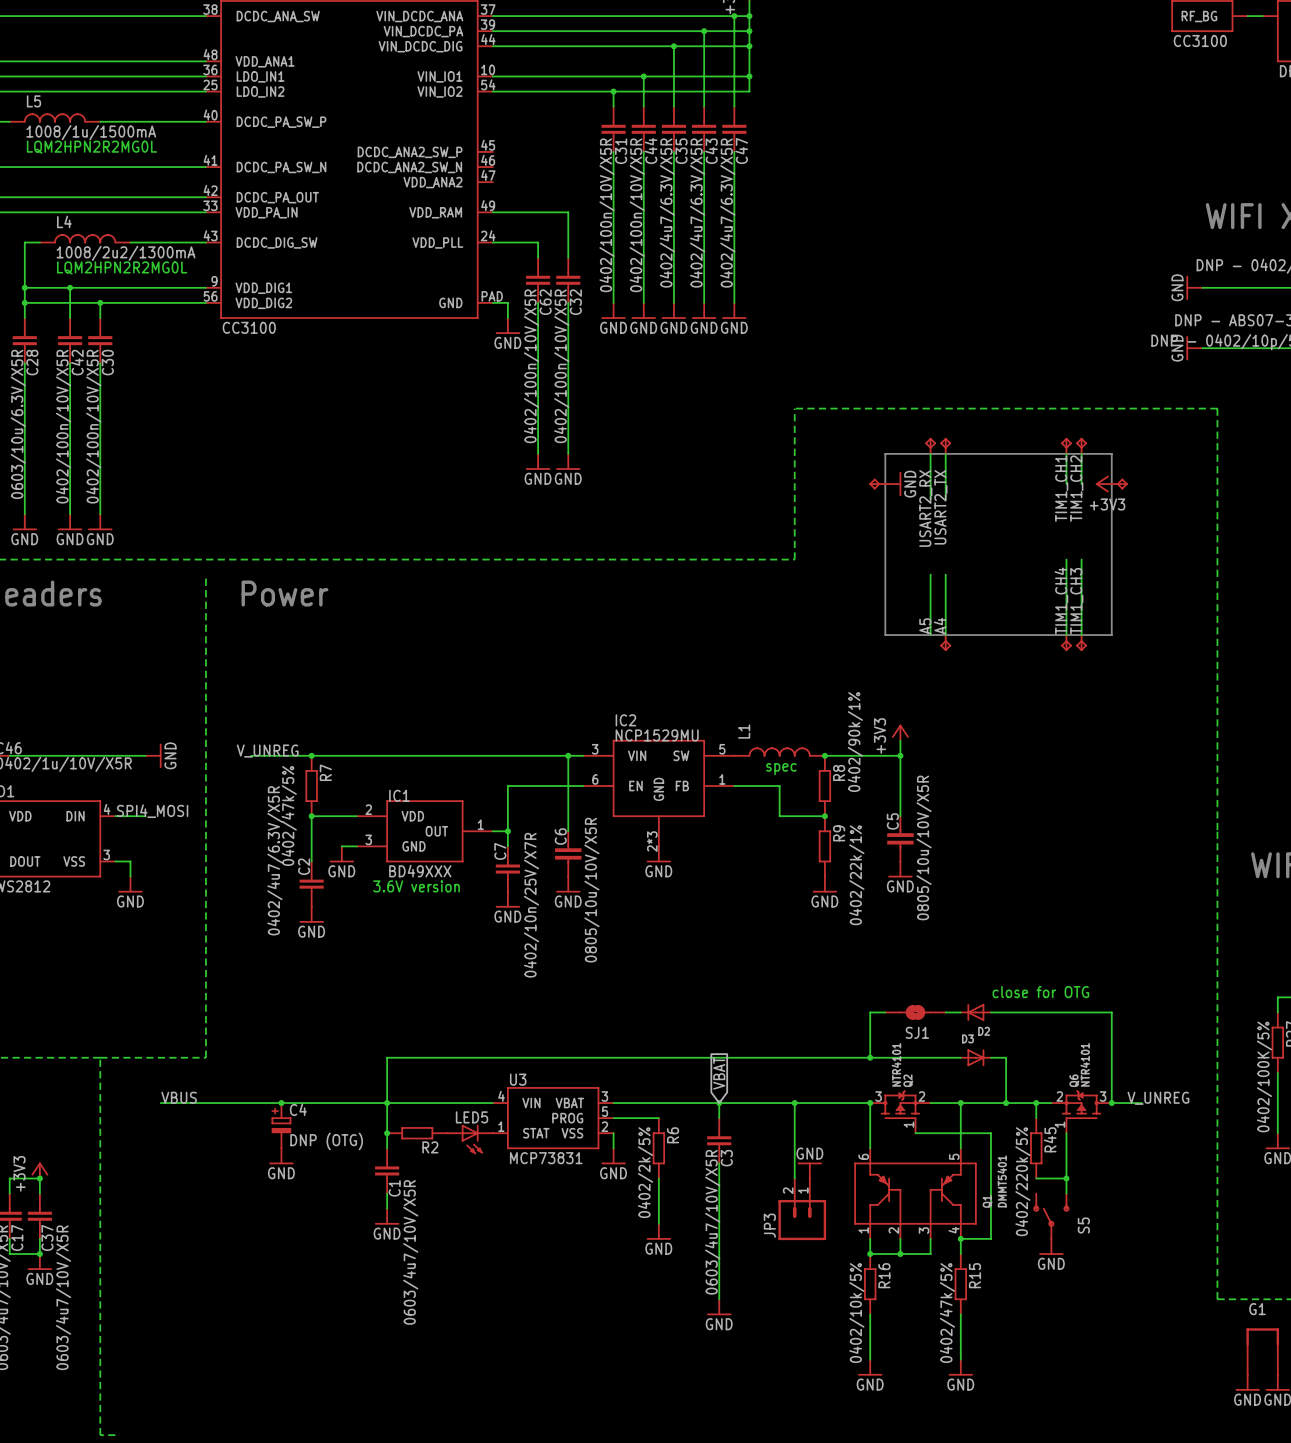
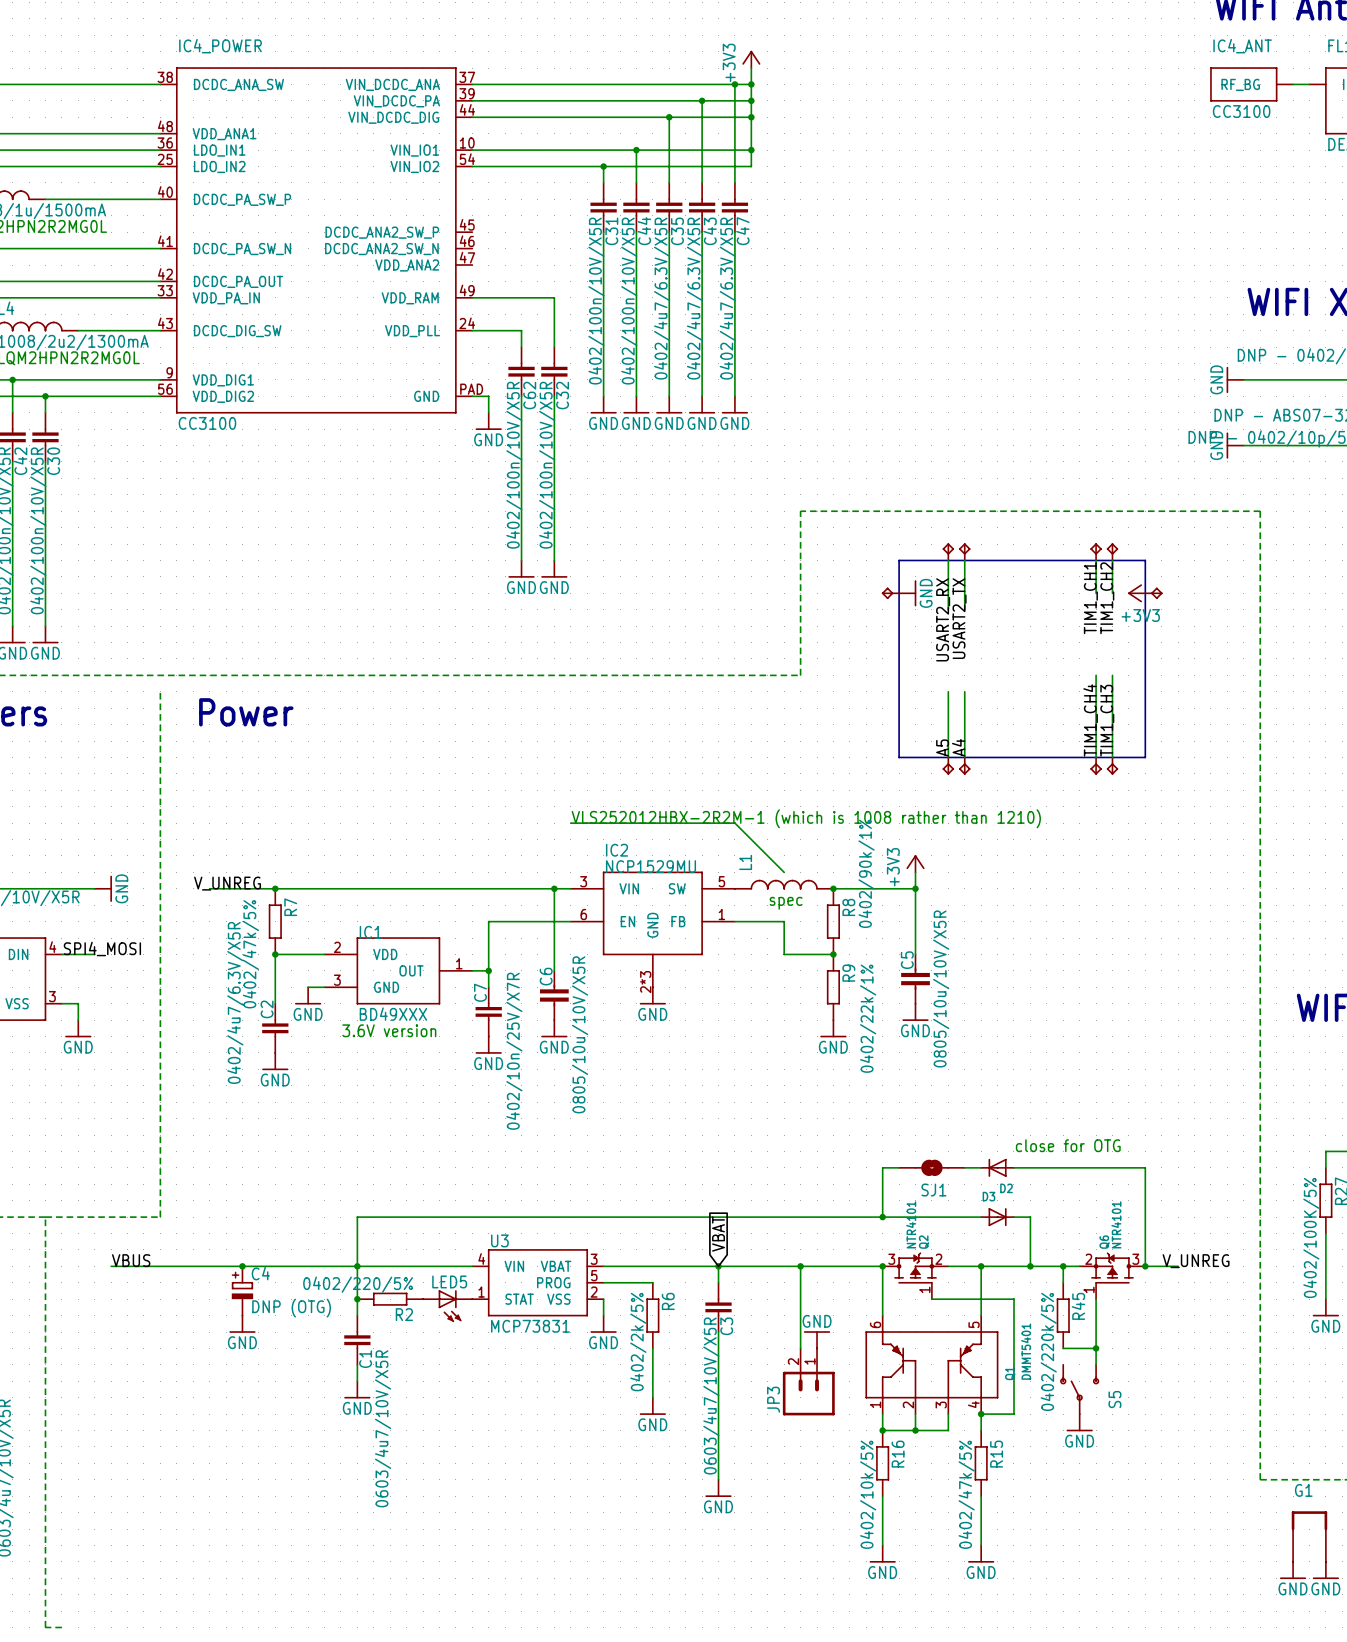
part: none -> (948, 766)
text: none -> VLS252012HBX-2R2M-1 (which is 1008 rather than 1210) (806, 818)
wire: none -> (570, 823) (734, 823) (784, 872)
R2 value: none -> 0402/220/5% (358, 1284)

